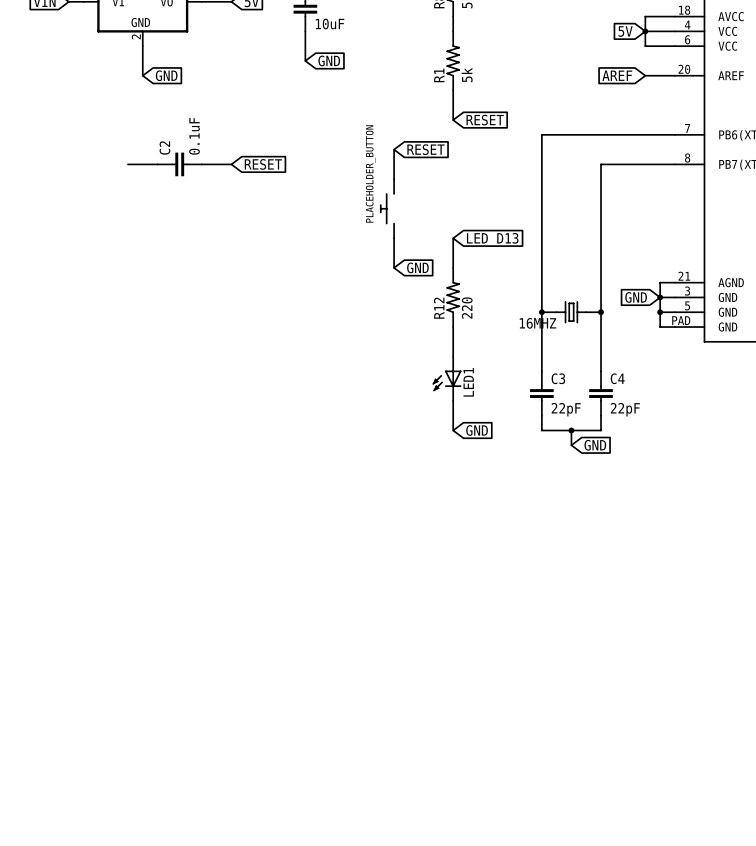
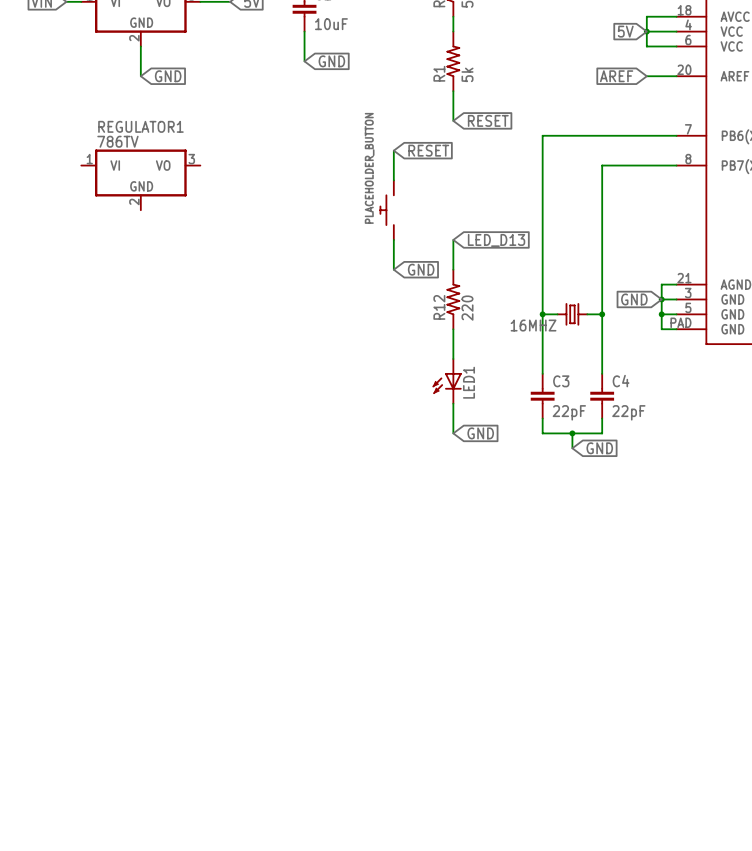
wire: (127, 164) (157, 164) -> none
C2: 0.1uF (179, 164) -> none
wire: (201, 164) (231, 164) -> none
global label: RESET (263, 164) -> none
REGULATOR1: none -> 786TV (140, 179)

